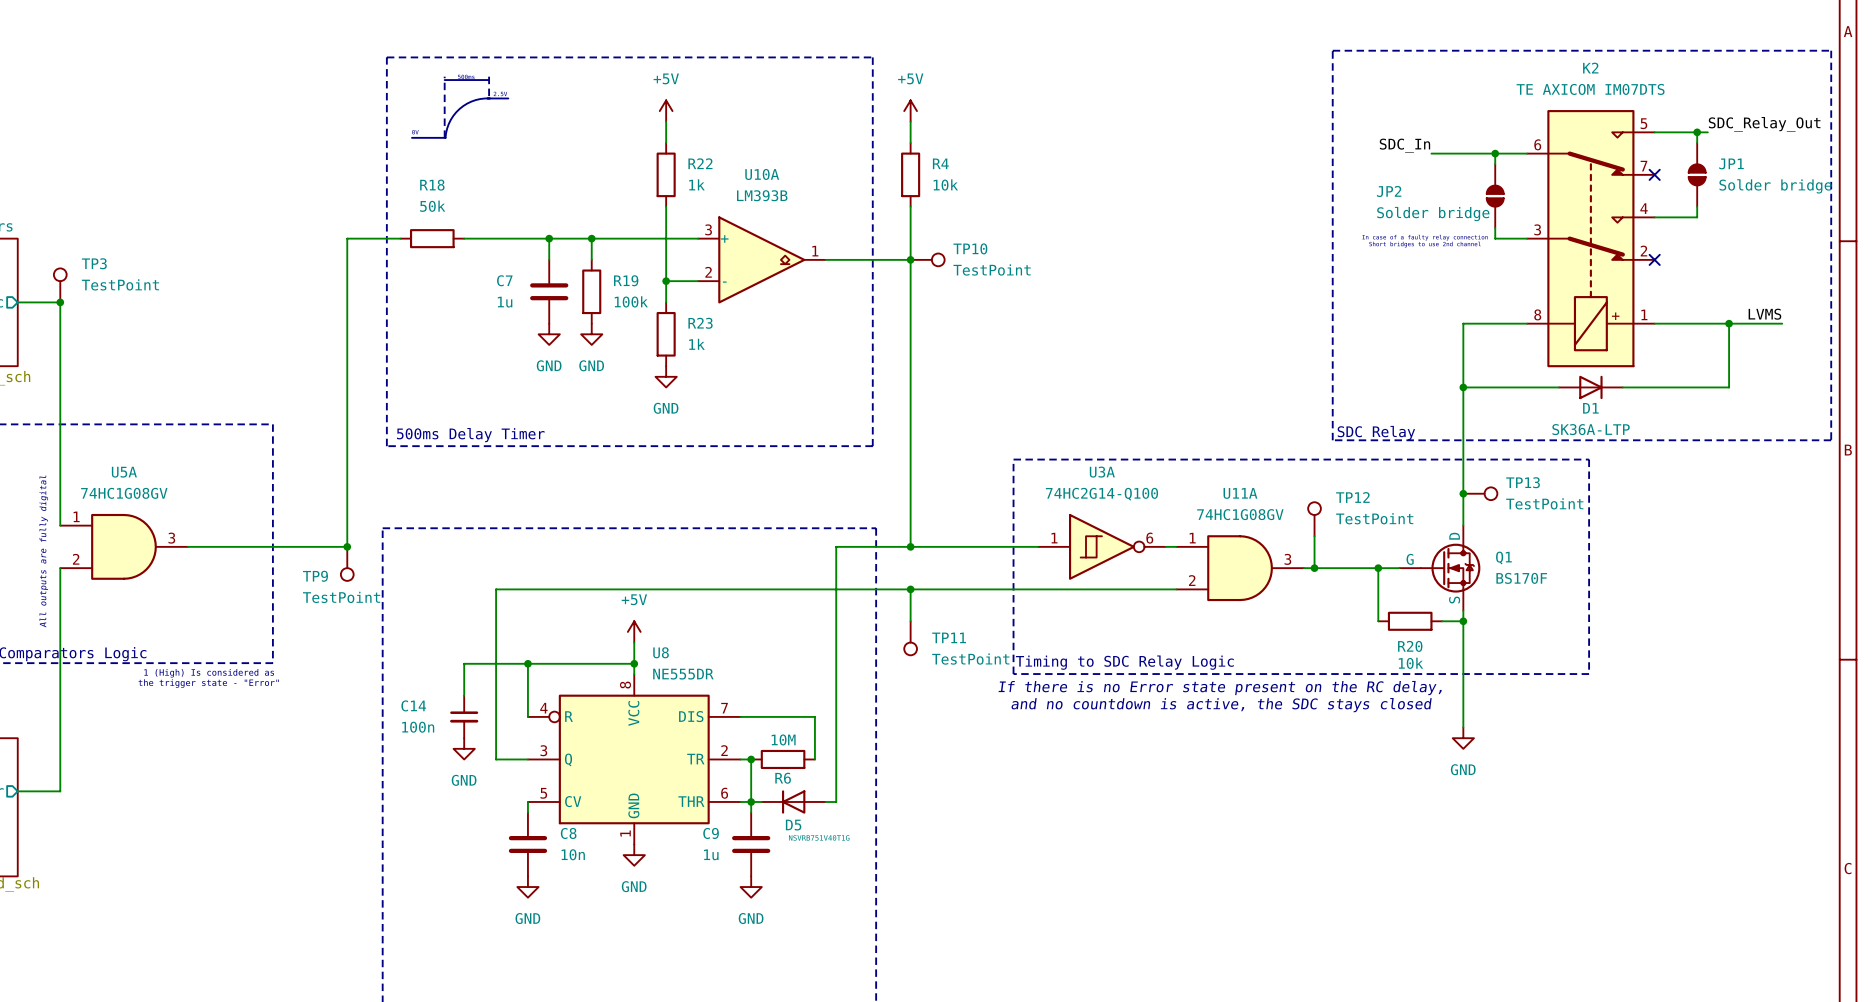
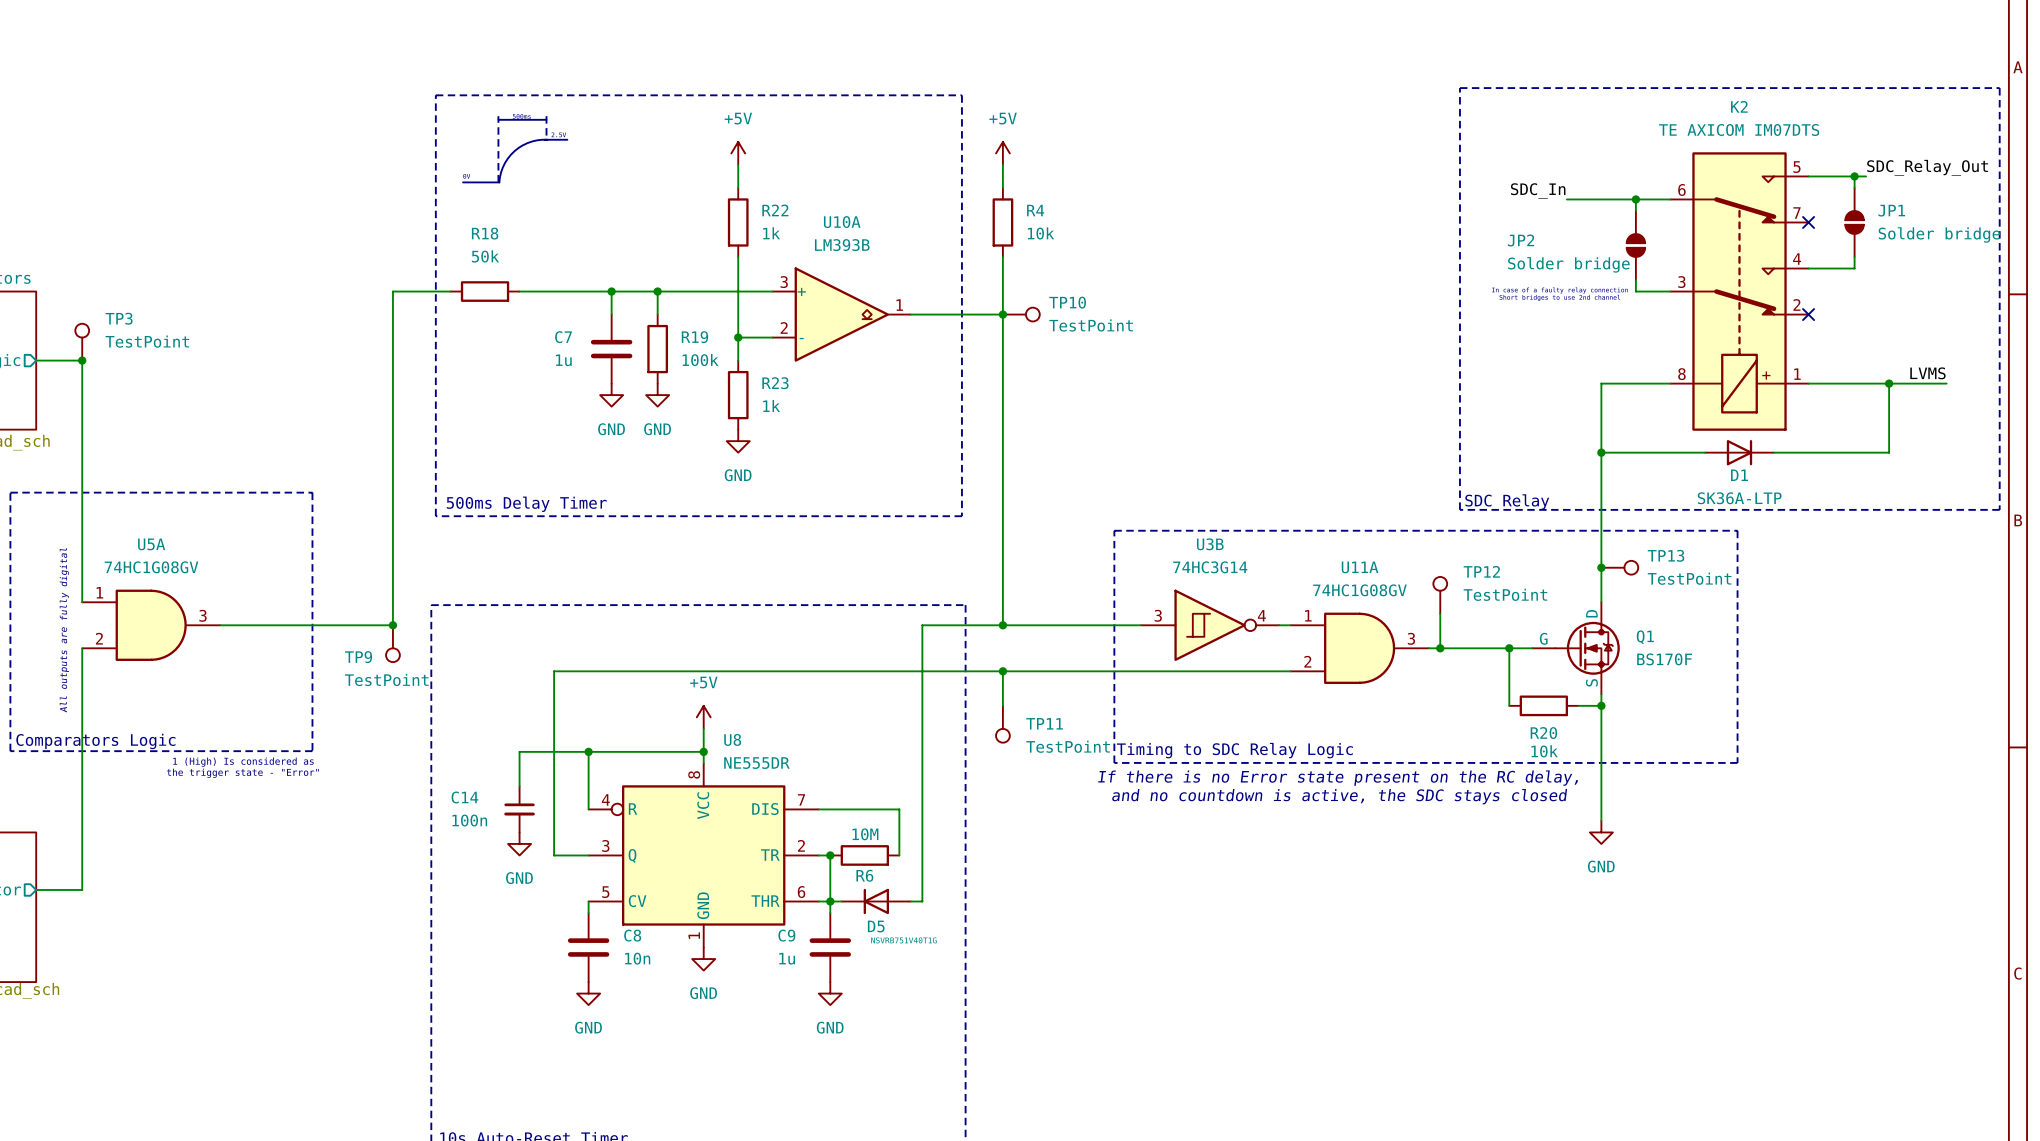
U3A name: U3A (1102, 472) -> U3B (1210, 544)
U3A value: 74HC2G14-Q100 (1101, 494) -> 74HC3G14 (1210, 567)
U3A pin number: 1 (1054, 538) -> 3 (1158, 615)
U3A pin number: 6 (1149, 538) -> 4 (1261, 615)

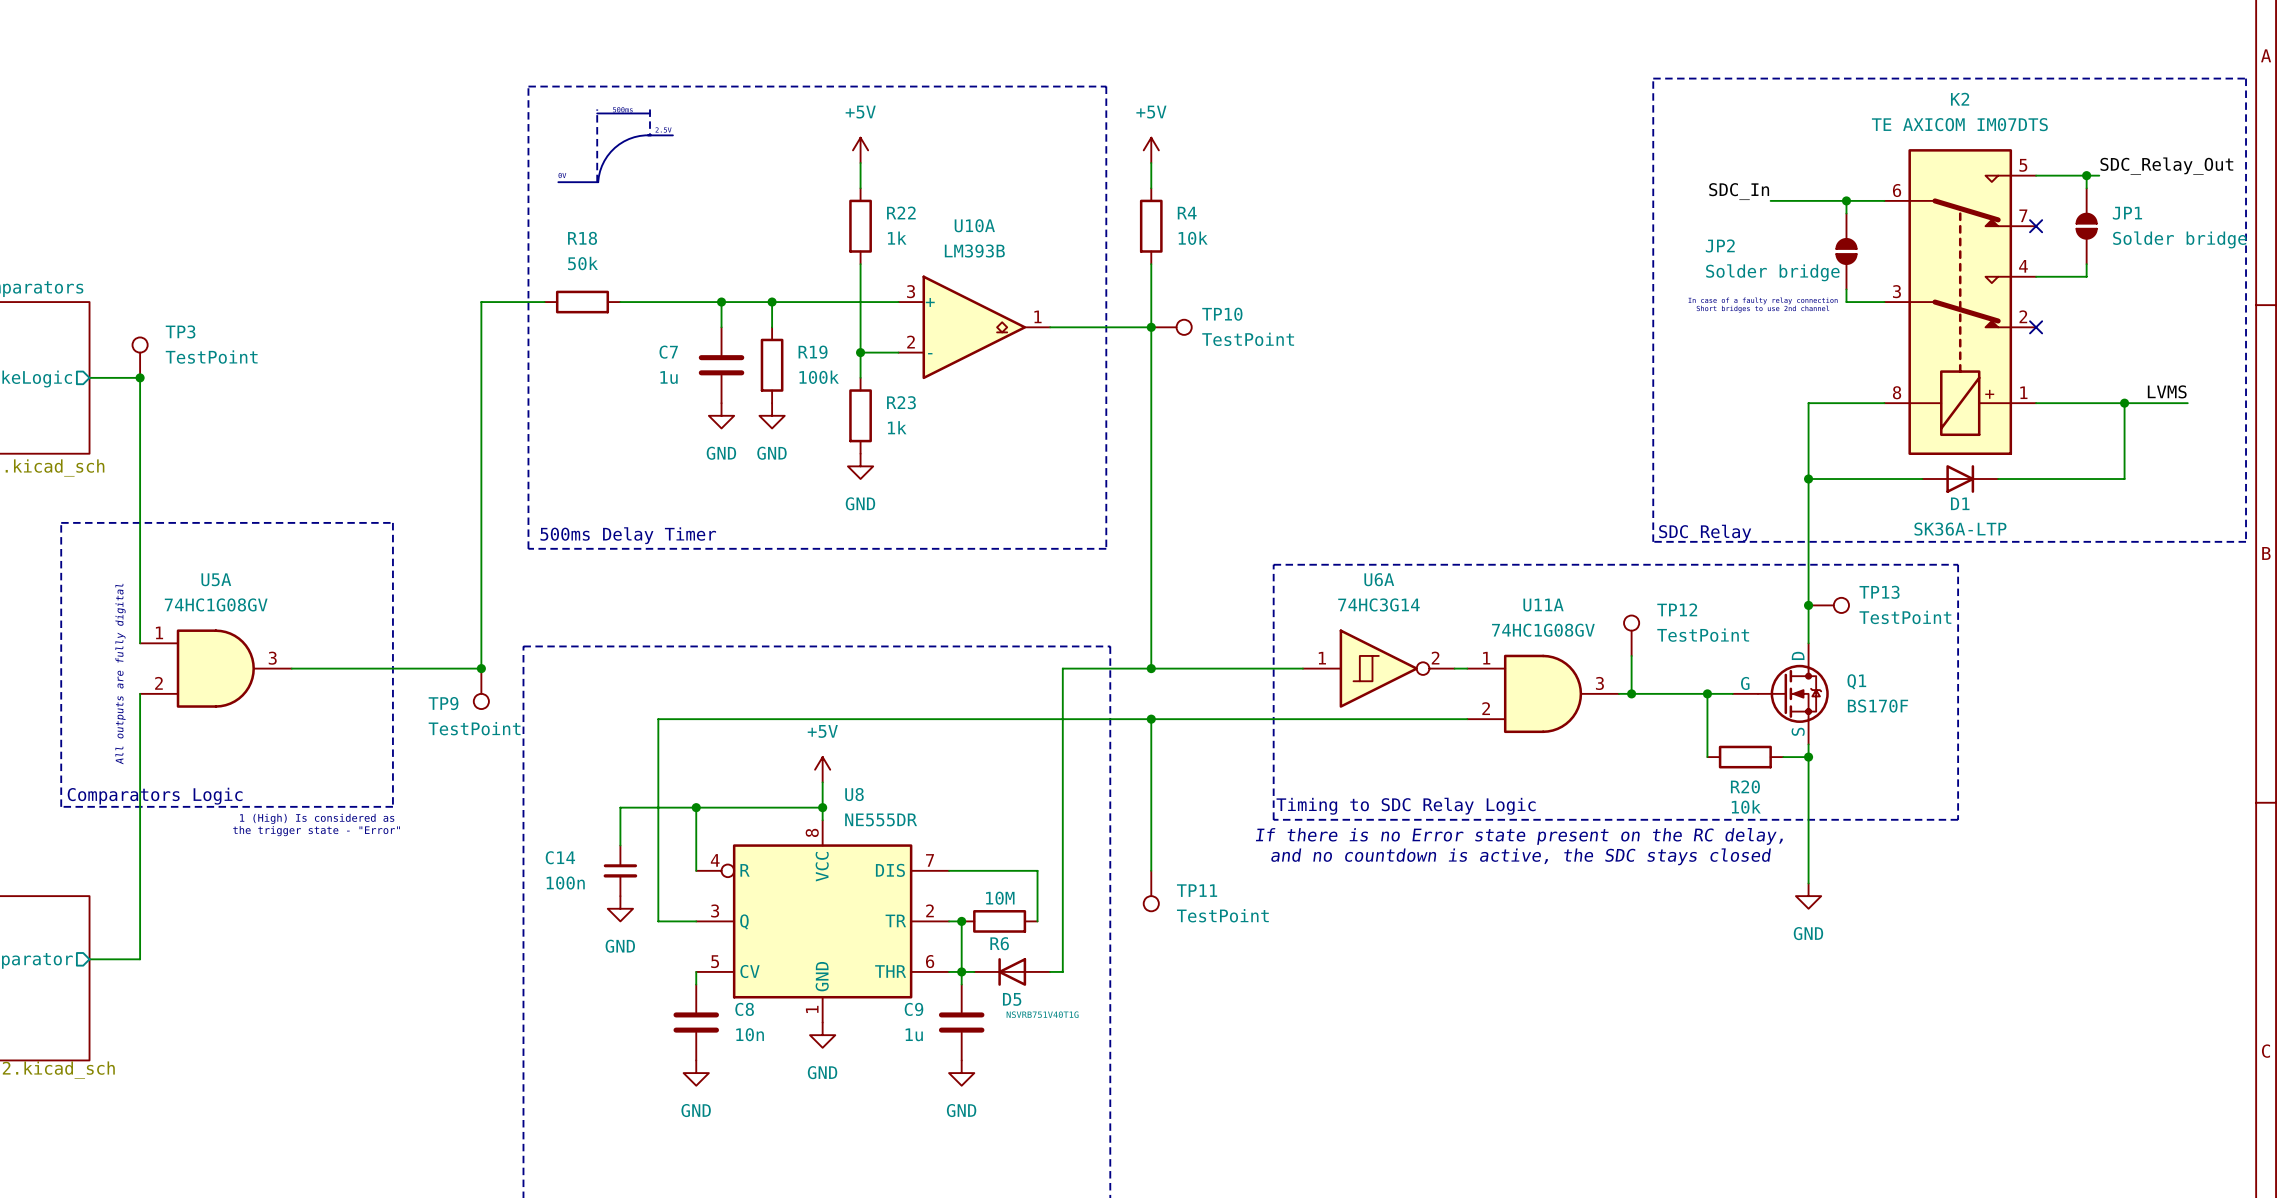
U3B name: U3B (1210, 544) -> U6A (1379, 579)
U3B pin number: 3 (1158, 615) -> 1 (1322, 658)
U3B pin number: 4 (1261, 615) -> 2 (1435, 658)
wire: none -> (1151, 757) (1151, 870)
TP11 position: (1002, 724) -> (1151, 891)

